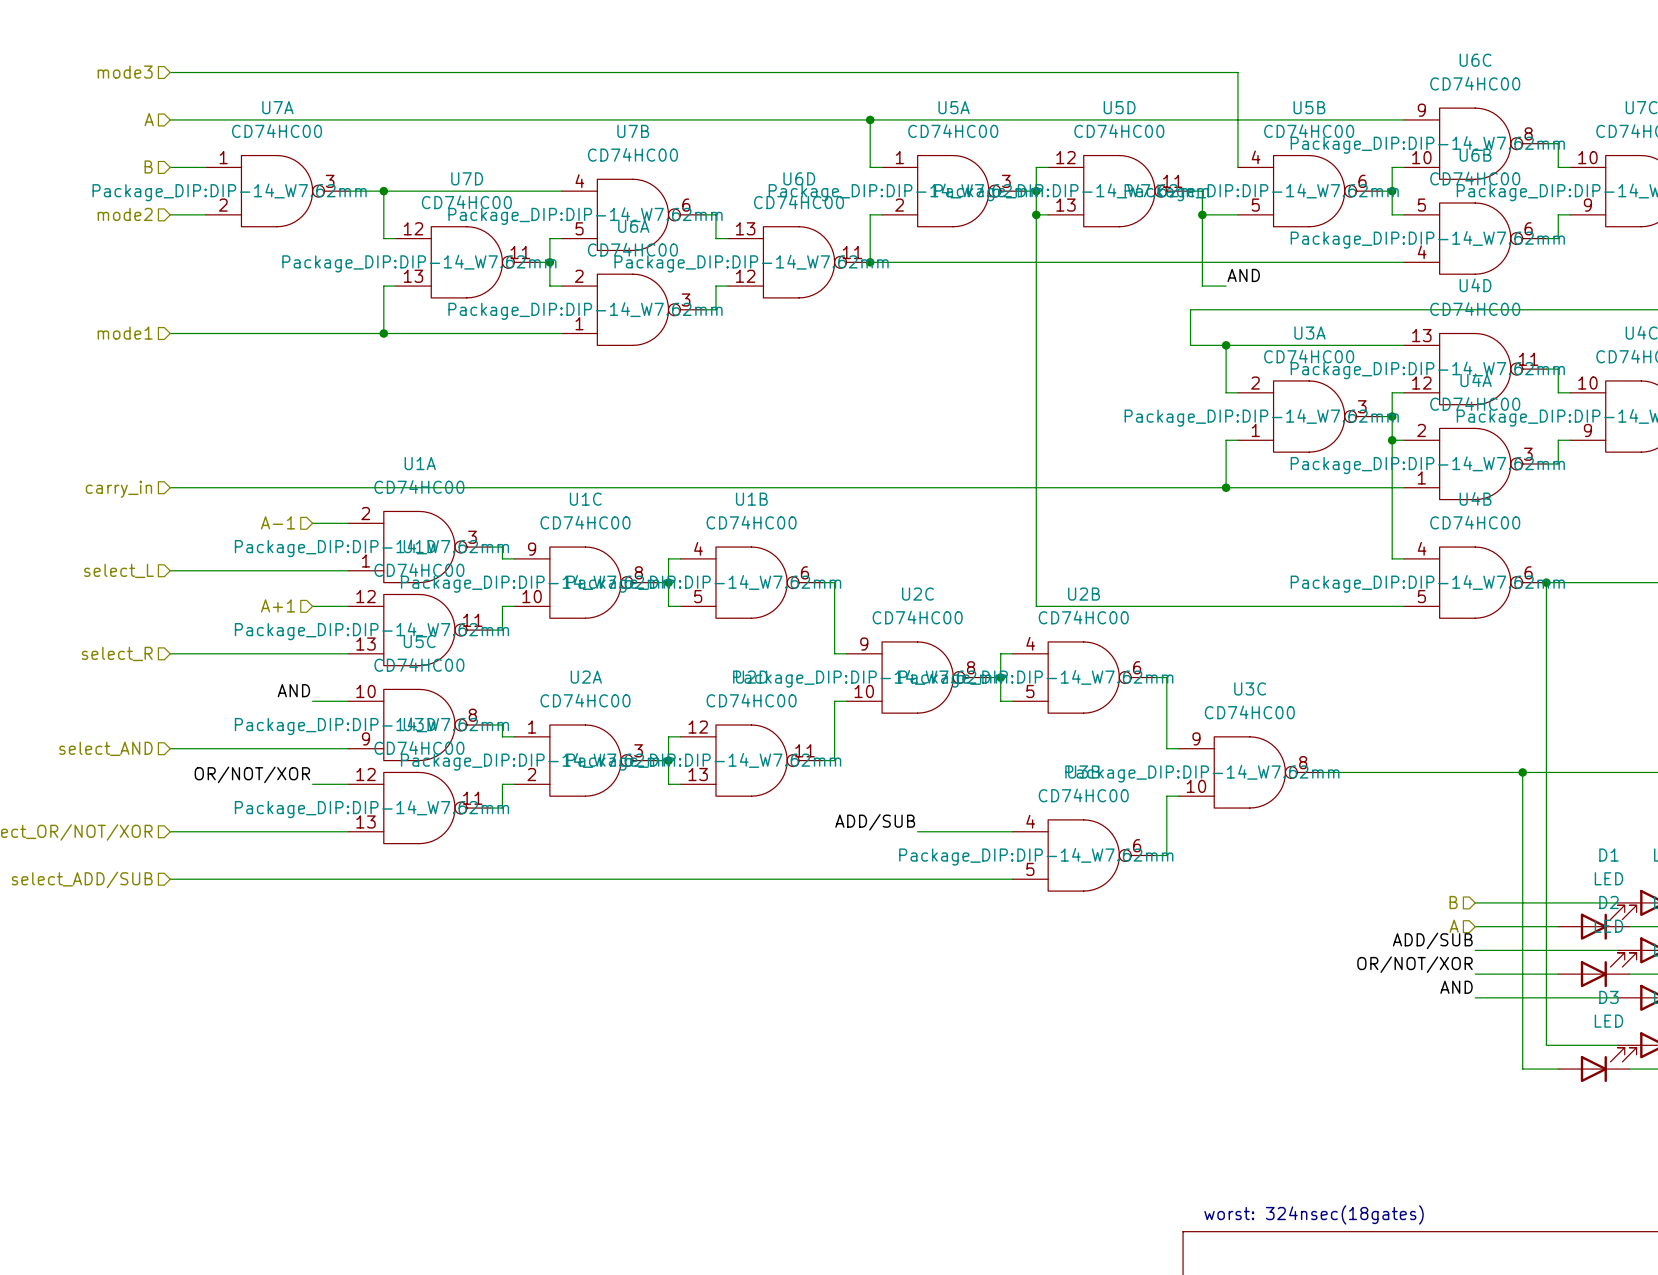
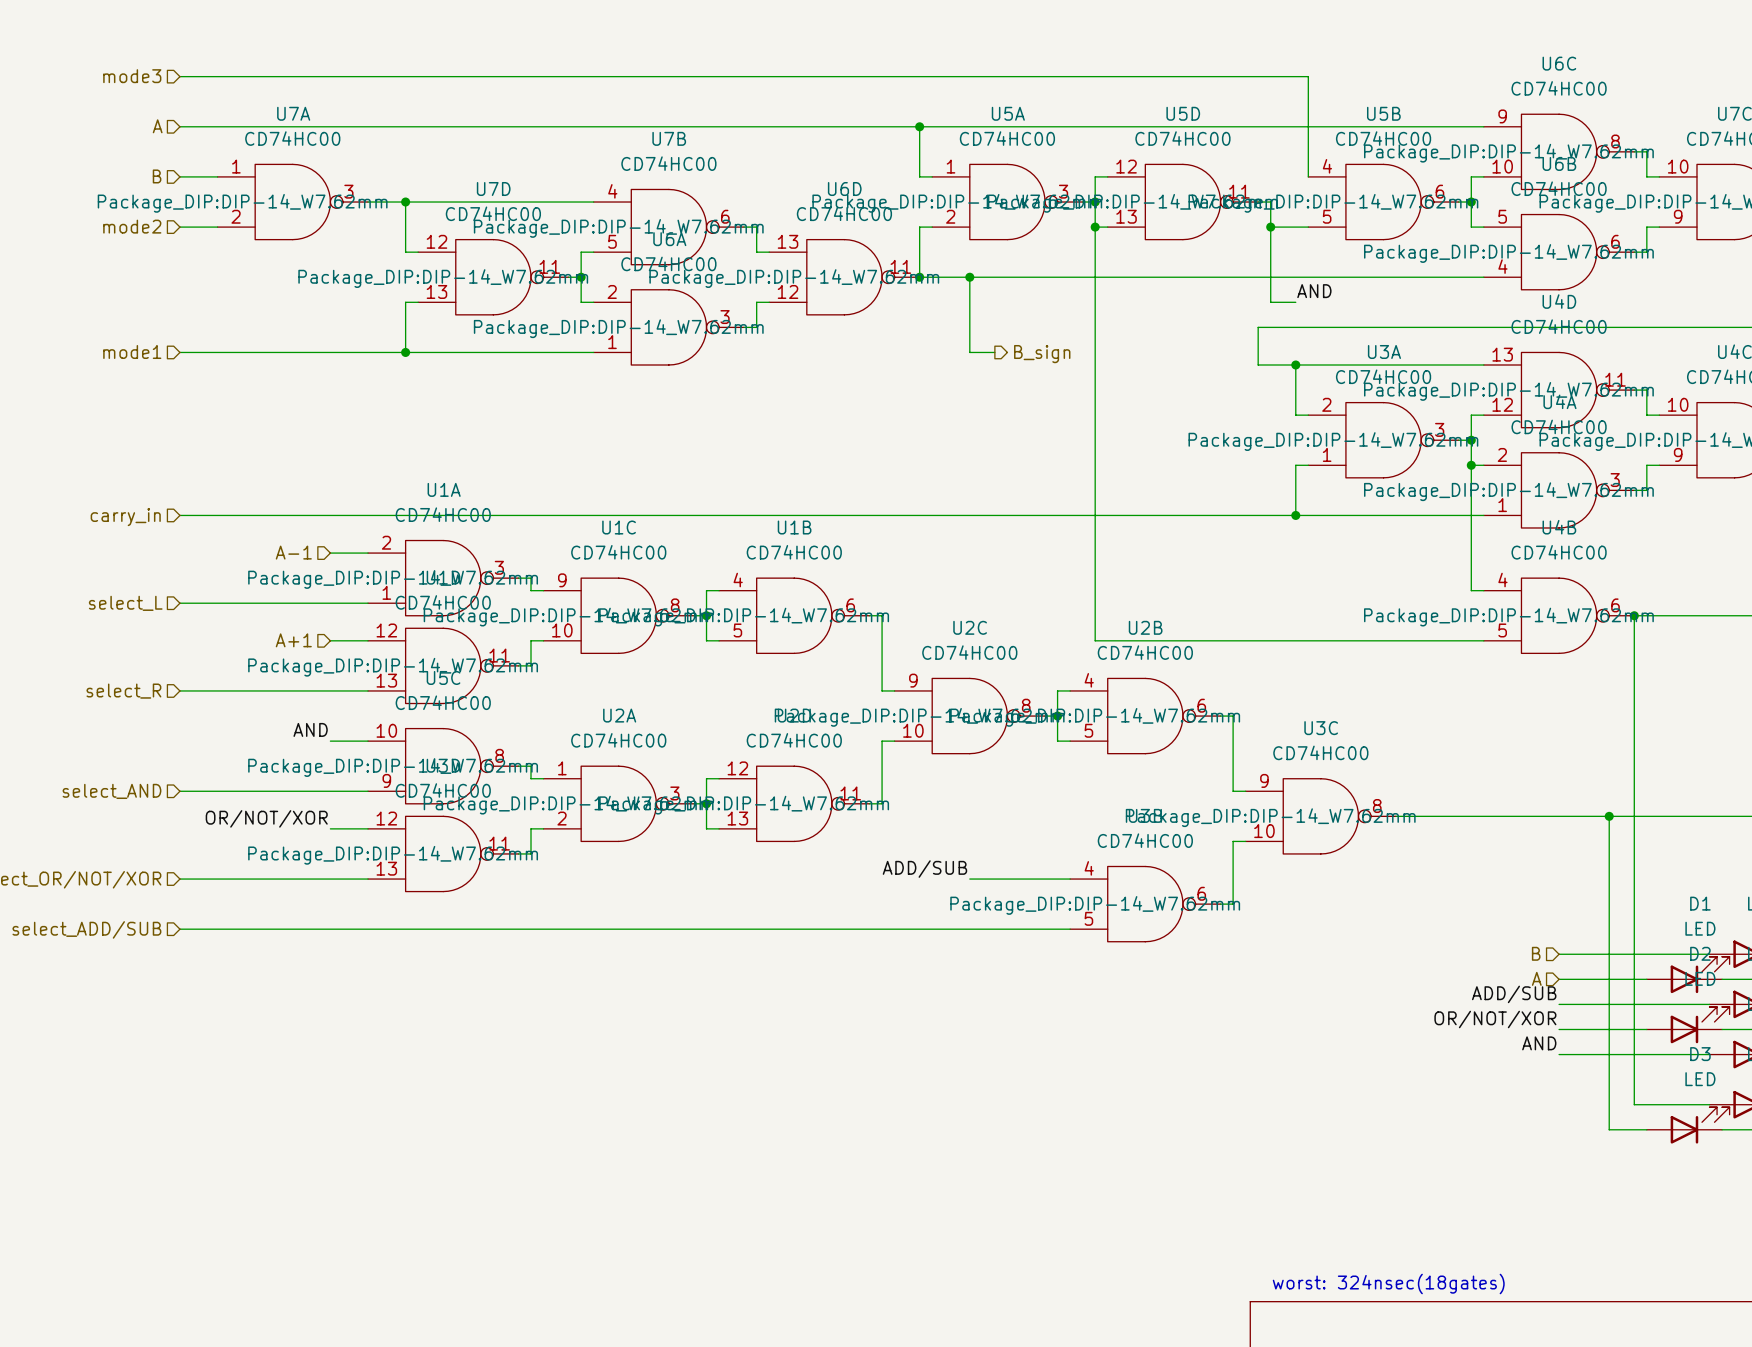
wire: none -> (969, 277) (969, 352) (994, 352)
junction: none -> (969, 277)
hierarchical label: none -> B_sign (1042, 354)

